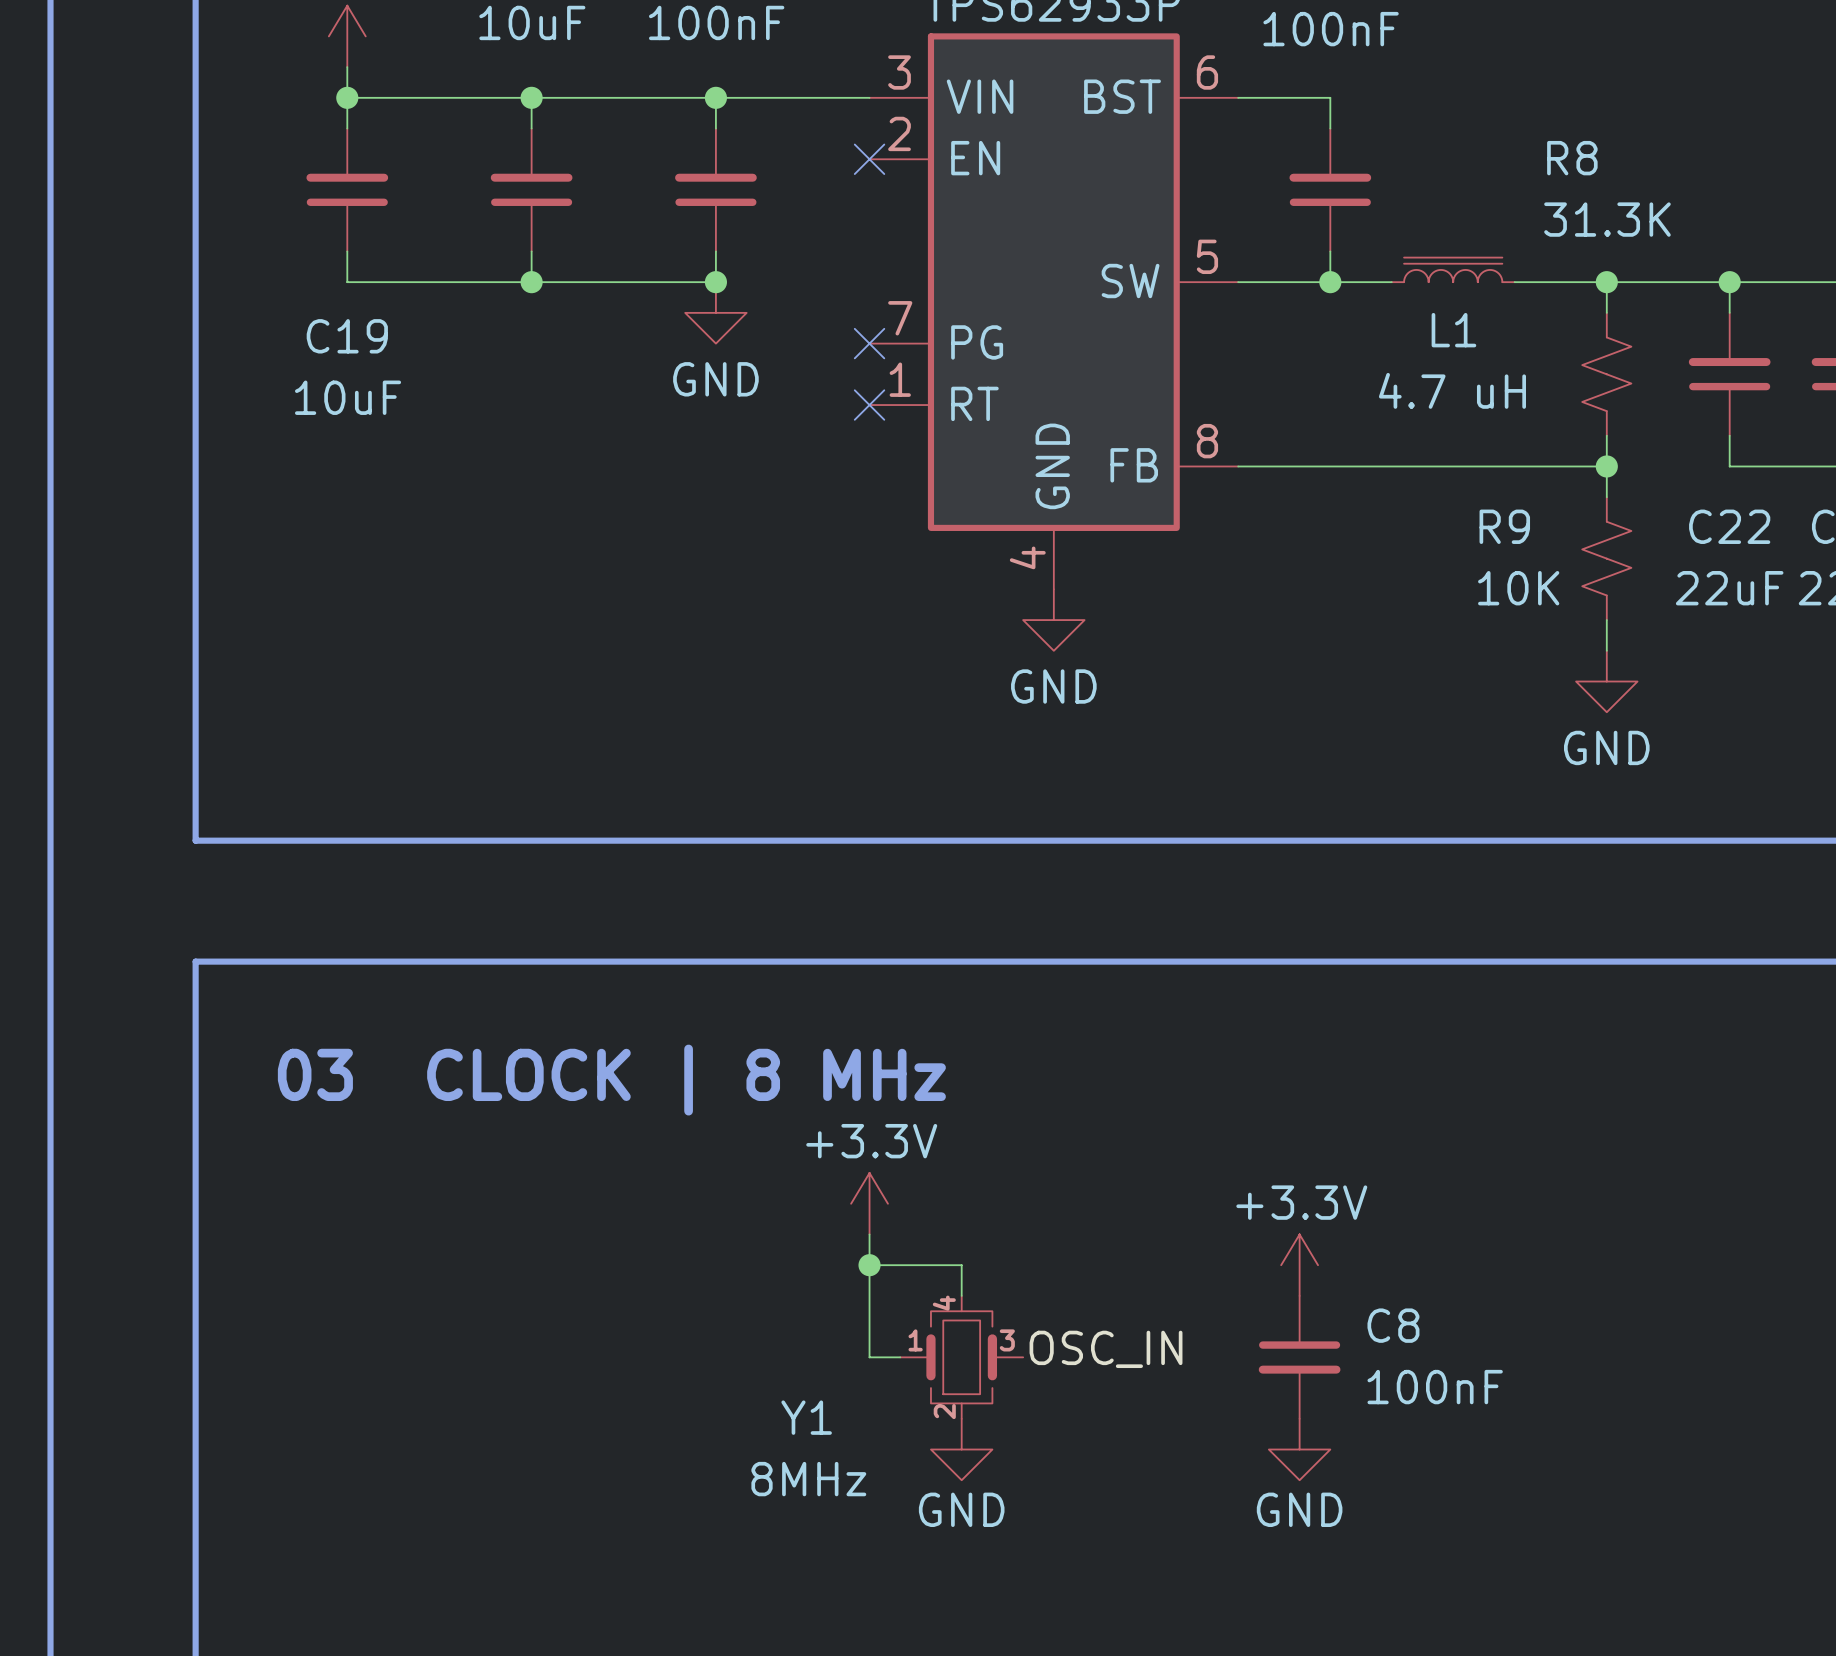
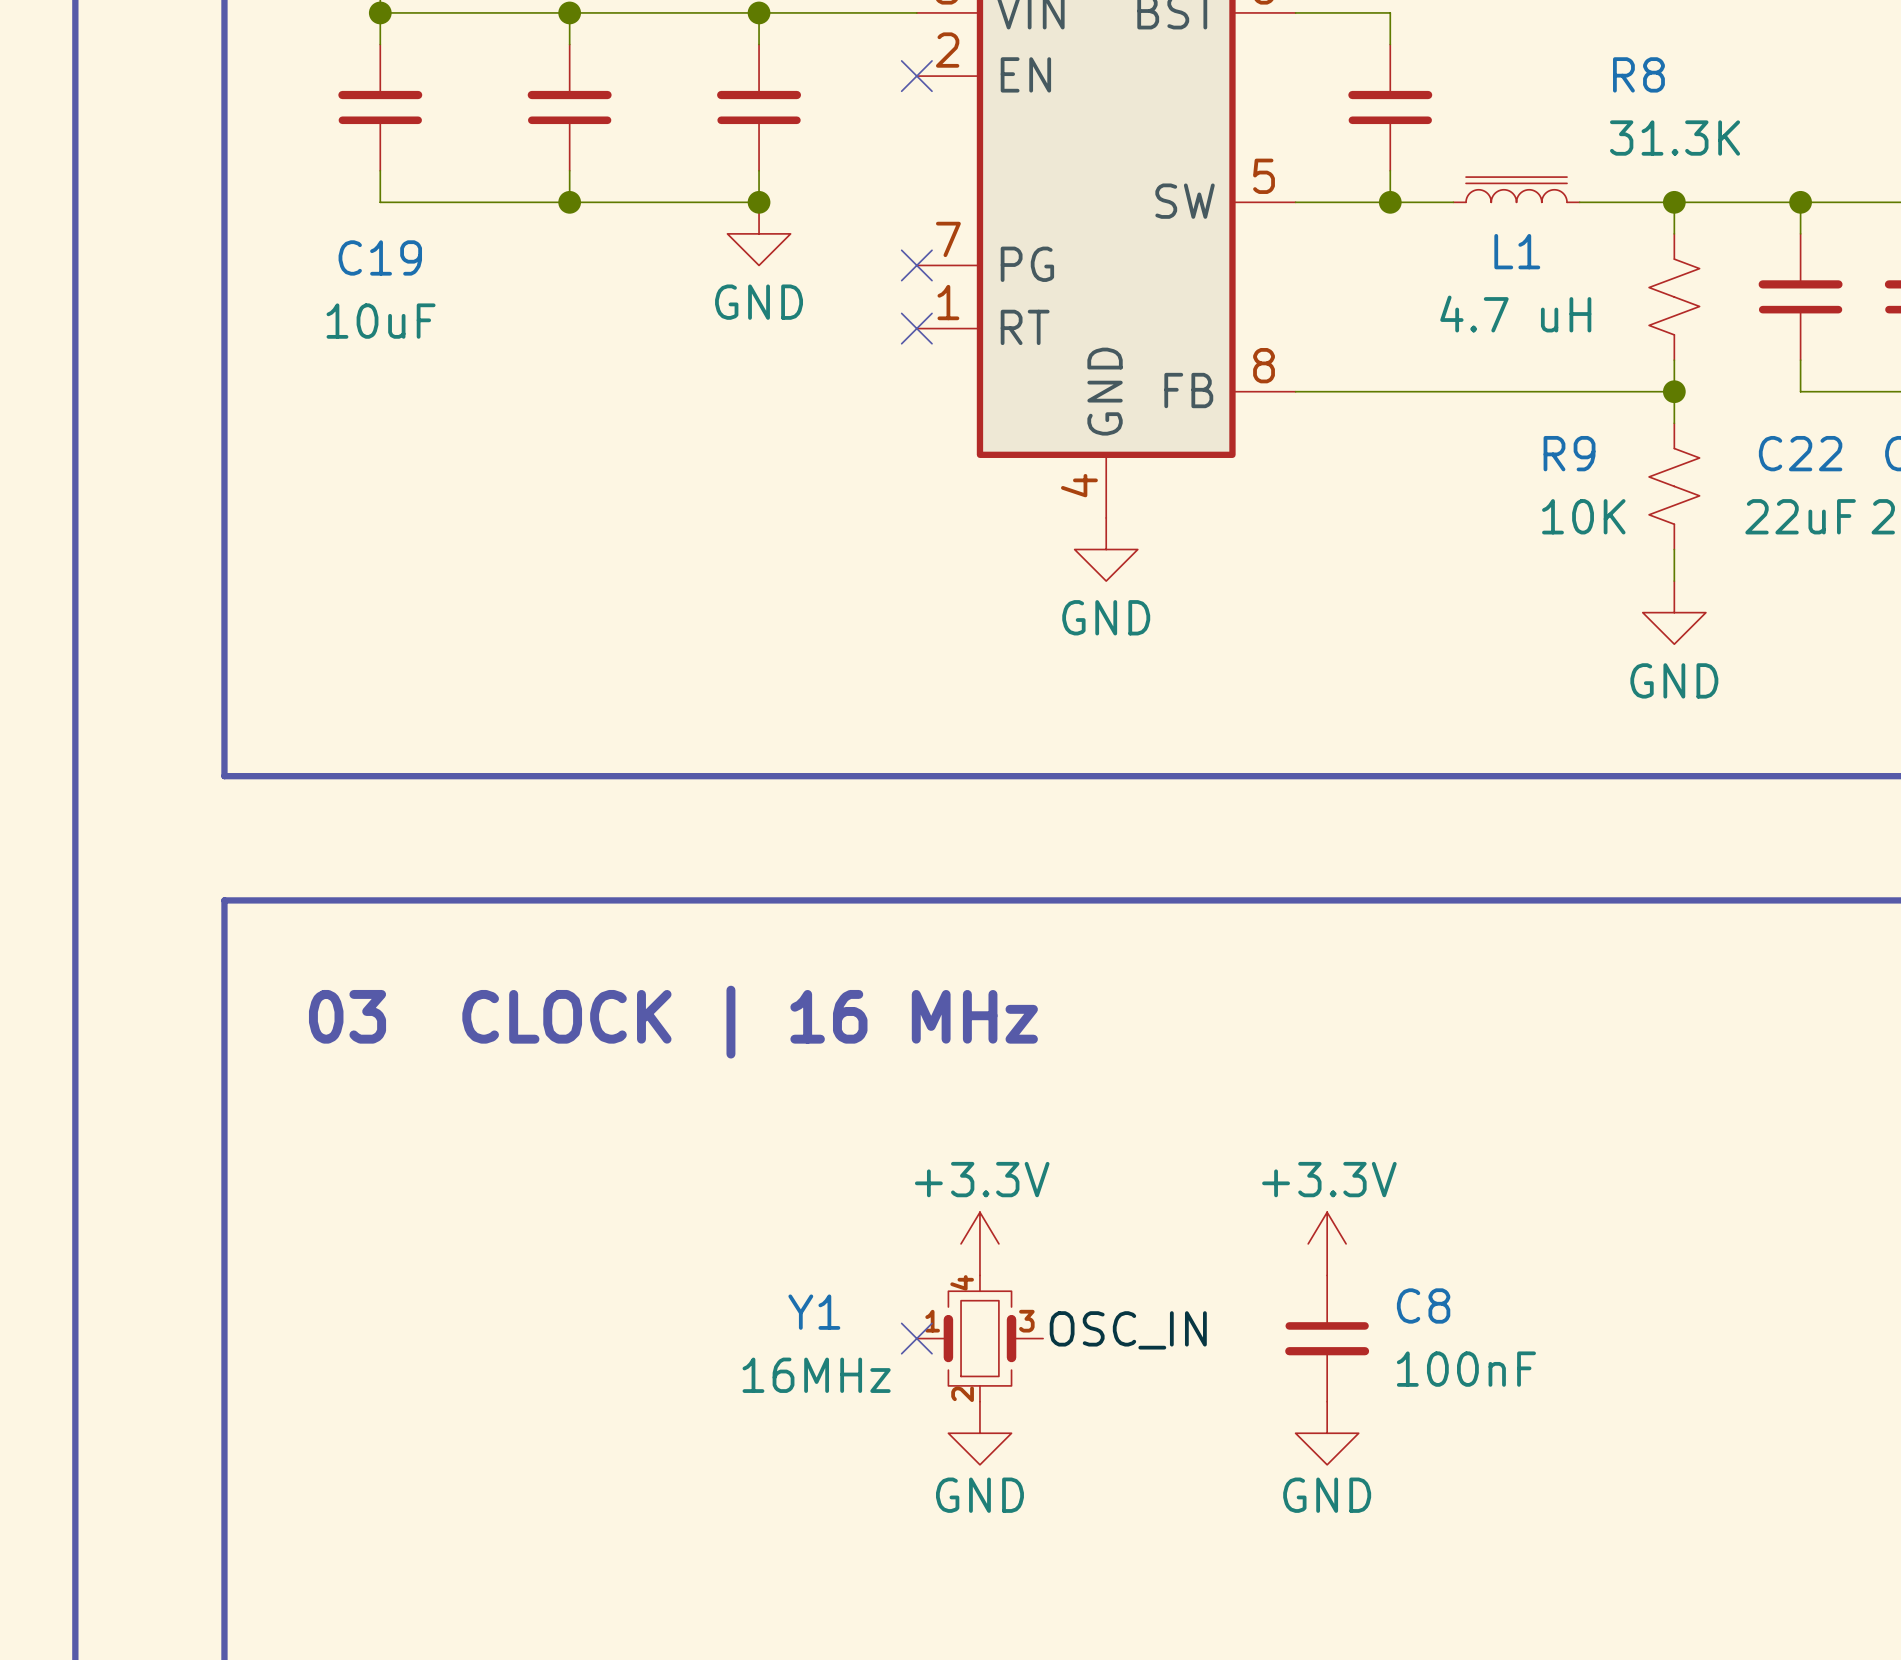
text: 03 CLOCK | 8 MHz (611, 1080) -> 03 CLOCK | 16 MHz (673, 1022)
power symbol position: +3.3V (869, 1203) -> +3.3V (979, 1243)
wire: (869, 1234) (869, 1357) (900, 1357) -> none
wire: (869, 1265) (961, 1265) (961, 1295) -> none
junction: (869, 1265) -> none
power symbol position: +3.3V (1299, 1265) -> +3.3V (1327, 1243)
label position: OSC_IN (1106, 1349) -> OSC_IN (1128, 1330)
Y1 position: (961, 1357) -> (979, 1338)
C8 position: (1299, 1357) -> (1327, 1338)
no-connect mark: none -> (916, 1338)
Y1 name position: Y1 (806, 1417) -> Y1 (814, 1312)
power symbol position: GND (961, 1449) -> GND (979, 1433)
power symbol position: GND (1299, 1449) -> GND (1327, 1433)
Y1 value: 8MHz (808, 1479) -> 16MHz (816, 1375)

